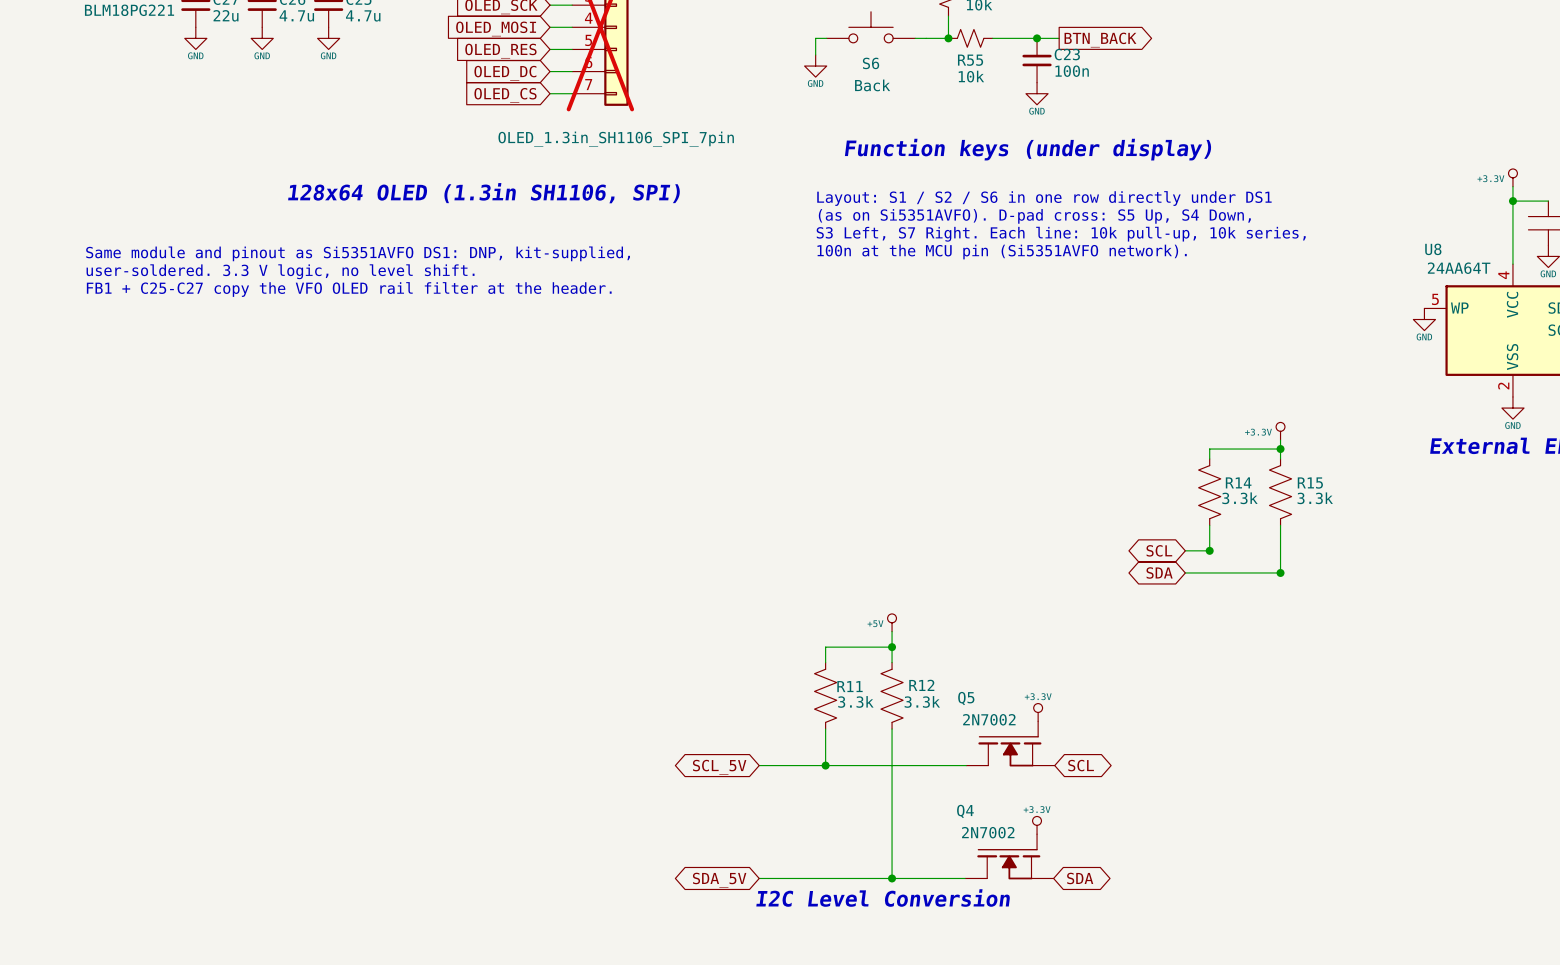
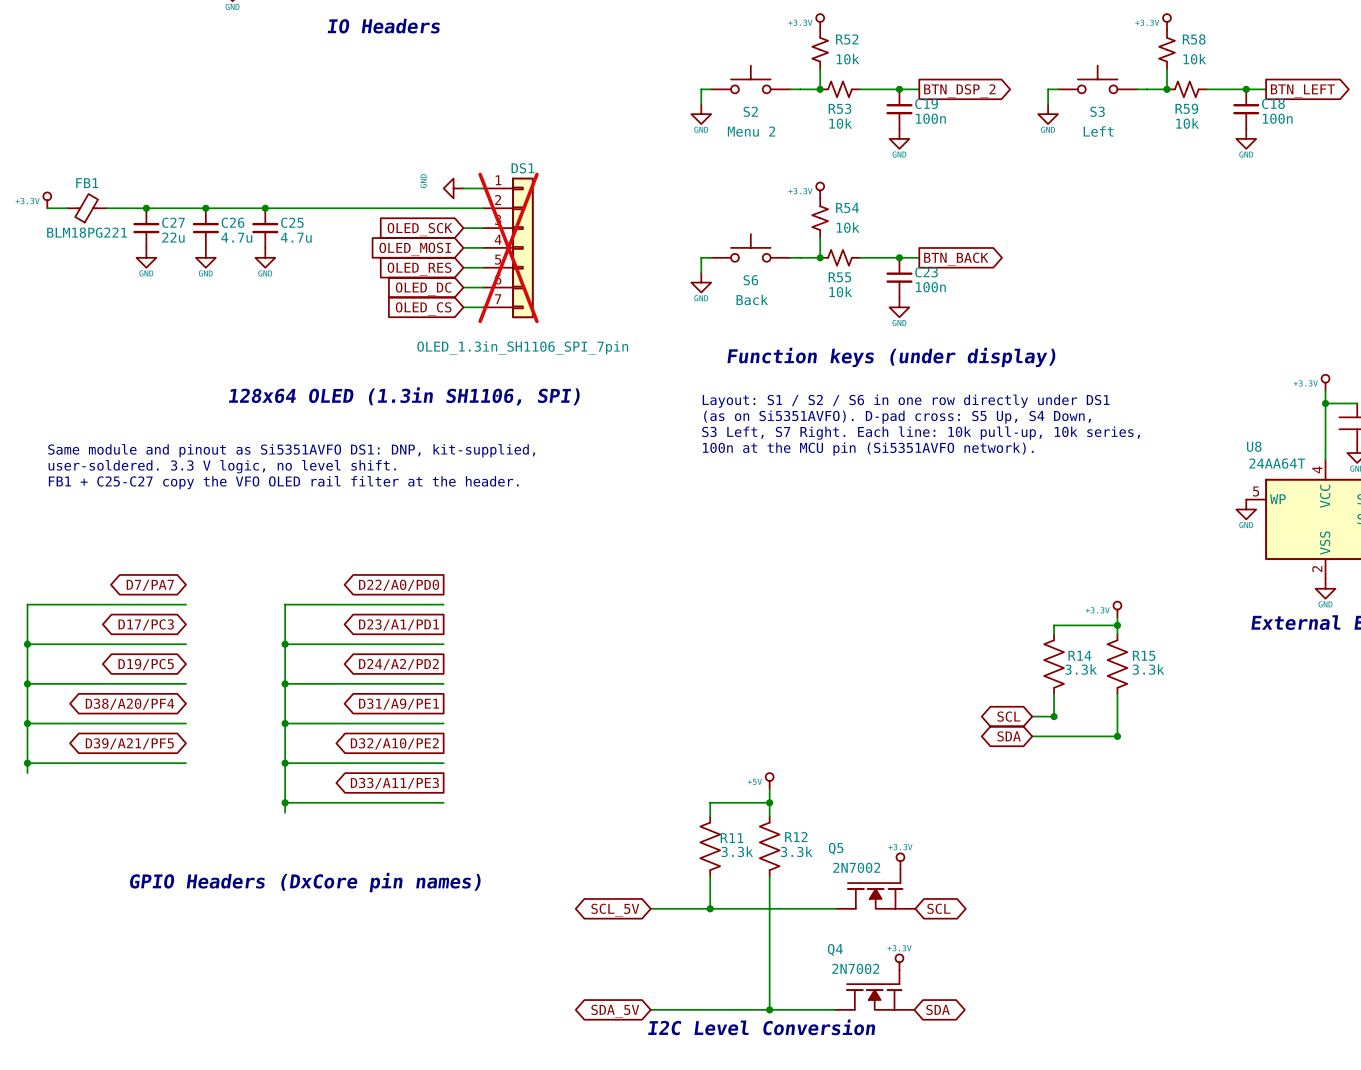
global label: none -> D7/PA7 (150, 585)
global label: none -> D22/A0/PD0 (399, 585)
wire: none -> (186, 604) (27, 604) (27, 773)
wire: none -> (443, 604) (285, 604) (285, 812)
global label: none -> D17/PC3 (146, 624)
global label: none -> D23/A1/PD1 (399, 624)
wire: none -> (27, 644) (186, 644)
junction: none -> (27, 644)
wire: none -> (285, 644) (443, 644)
junction: none -> (285, 644)
global label: none -> D19/PC5 (146, 664)
global label: none -> D24/A2/PD2 (398, 664)
wire: none -> (27, 683) (186, 683)
junction: none -> (27, 683)
wire: none -> (285, 683) (443, 683)
junction: none -> (285, 683)
global label: none -> D38/A20/PF4 (130, 704)
global label: none -> D31/A9/PE1 (399, 704)
wire: none -> (27, 723) (186, 723)
junction: none -> (27, 723)
wire: none -> (285, 723) (443, 723)
junction: none -> (285, 723)
global label: none -> D39/A21/PF5 (129, 743)
global label: none -> D32/A10/PE2 (394, 743)
wire: none -> (27, 763) (186, 763)
junction: none -> (27, 763)
wire: none -> (285, 763) (443, 763)
junction: none -> (285, 763)
global label: none -> D33/A11/PE3 (394, 783)
wire: none -> (285, 802) (443, 802)
junction: none -> (285, 802)
text: none -> GPIO Headers (DxCore pin names) (305, 882)

